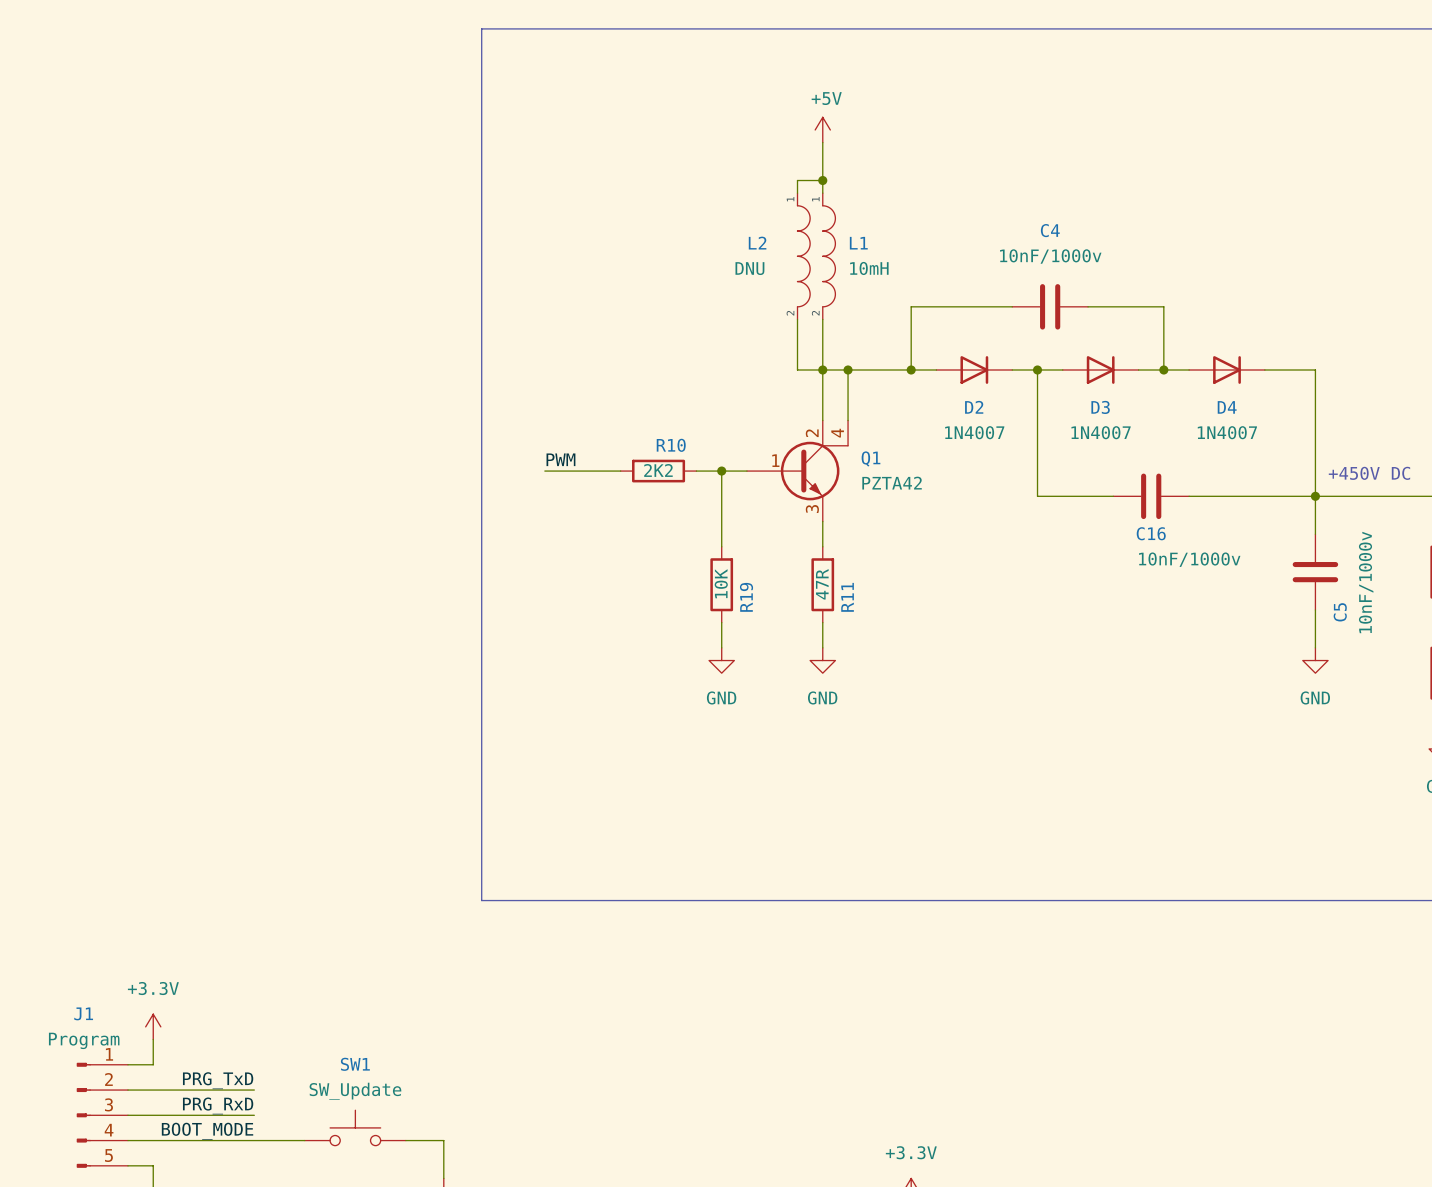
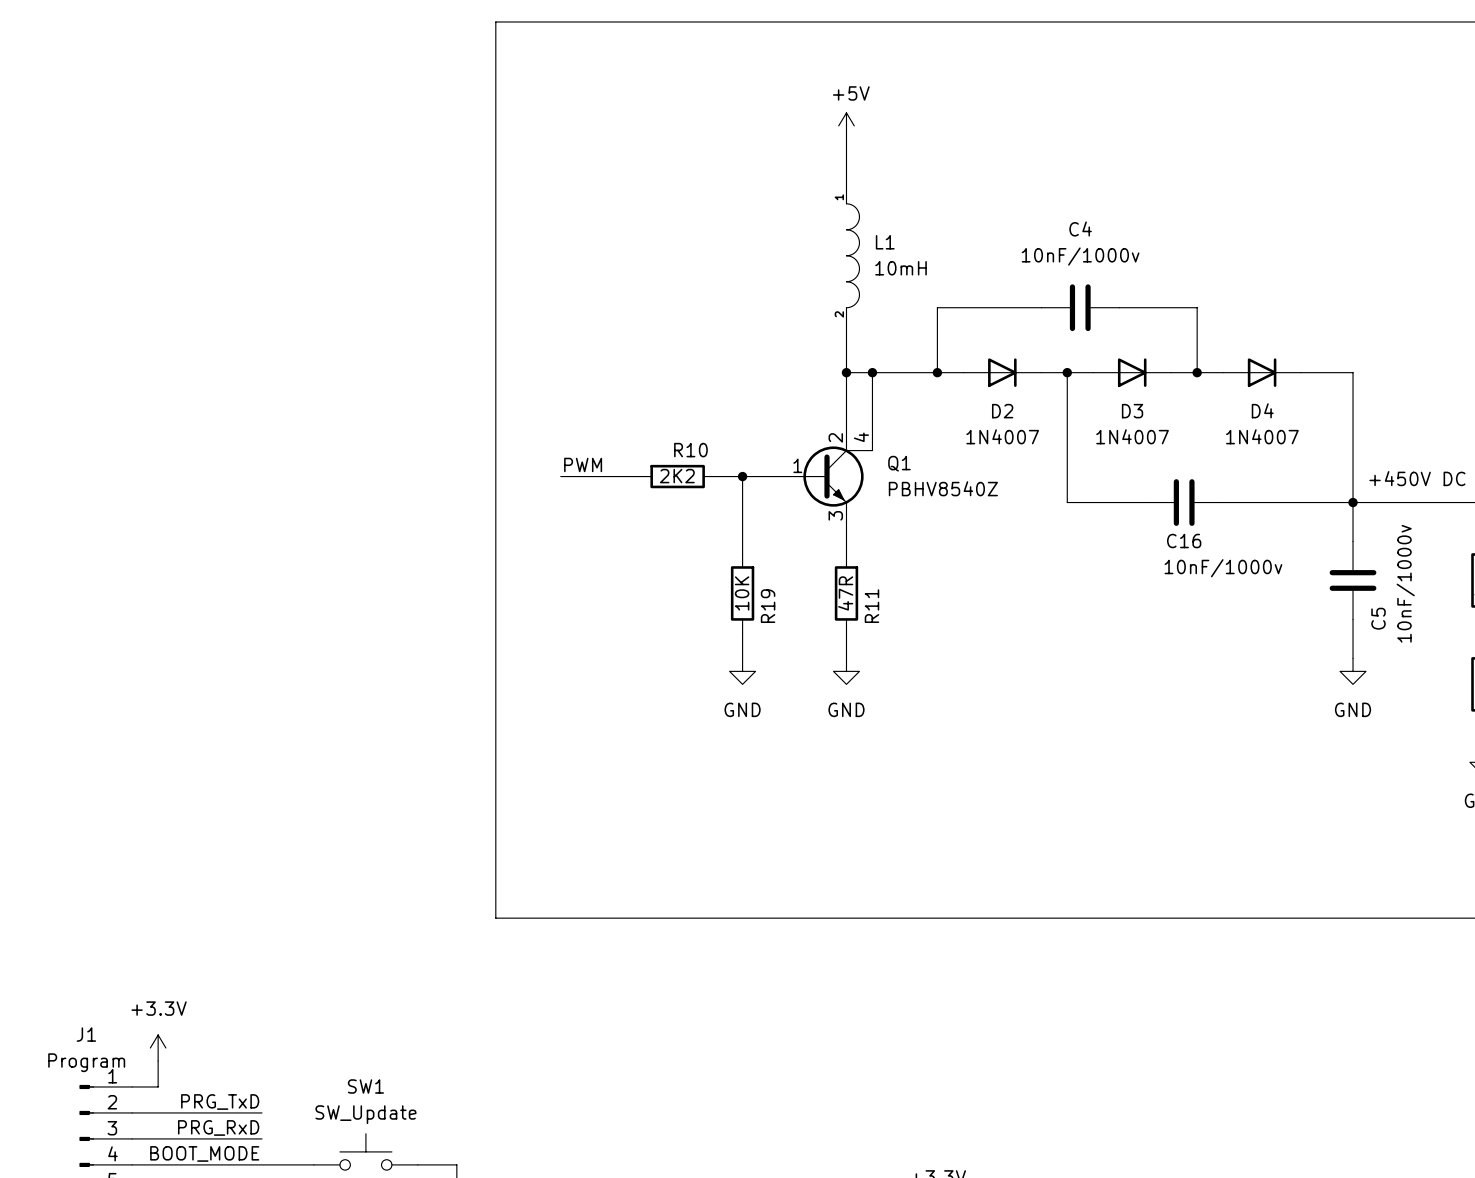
wire: (822, 180) (797, 180) (797, 193) -> none
junction: (822, 180) -> none
L2: DNU (803, 256) -> none
wire: (797, 319) (797, 369) (822, 369) -> none
Q1 value: PZTA42 (892, 483) -> PBHV8540Z (943, 488)

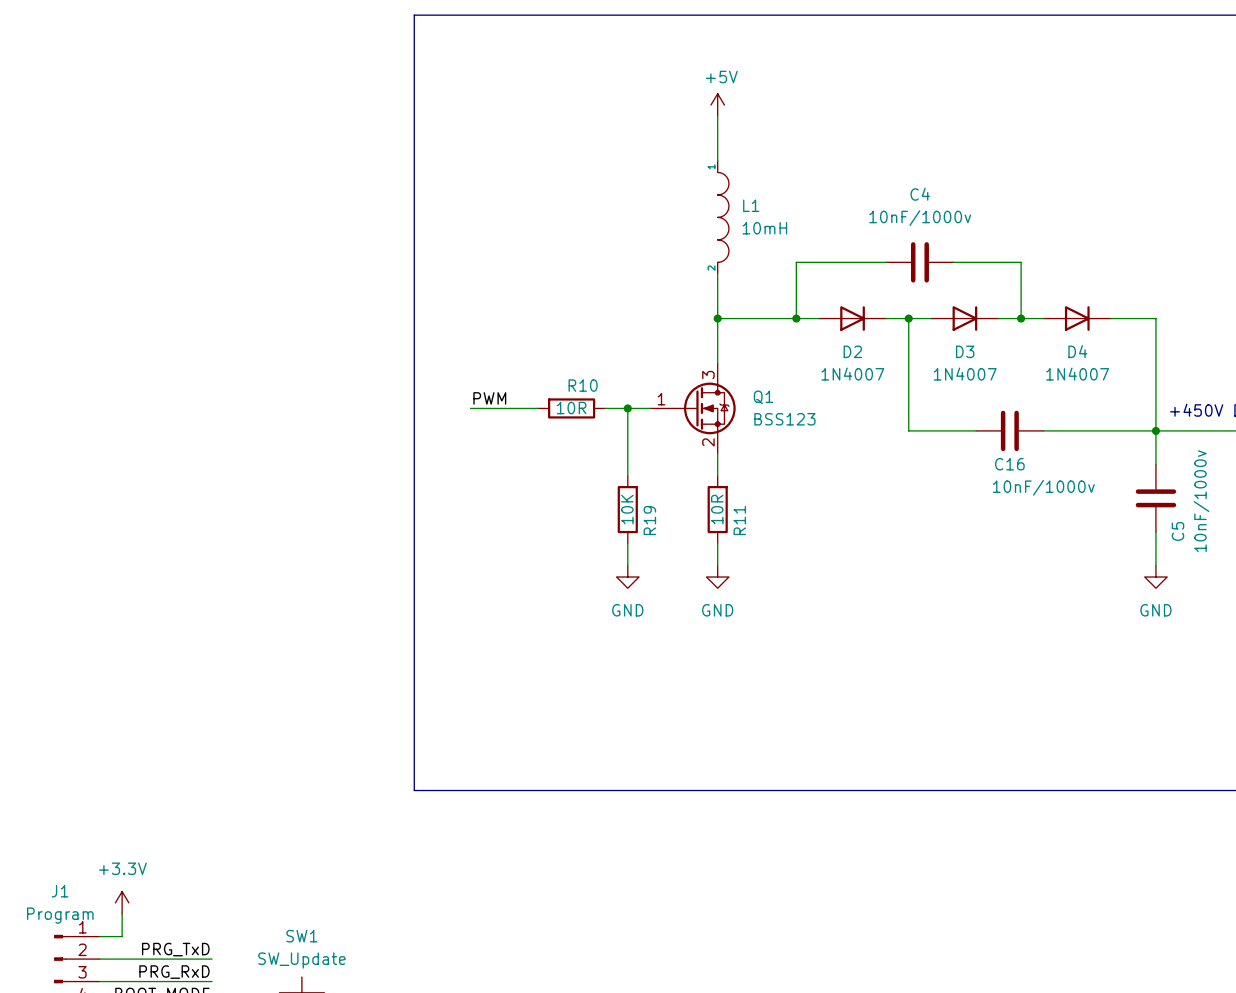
wire: (872, 372) (872, 424) -> none
junction: (872, 372) -> none
Q1 symbol: [768, 424, 873, 529] -> [650, 363, 736, 454]
R10 value: 2K2 (677, 476) -> 10R (571, 408)
Q1 value: PBHV8540Z (943, 488) -> BSS123 (784, 419)
R11 value: 47R (845, 593) -> 10R (717, 509)

